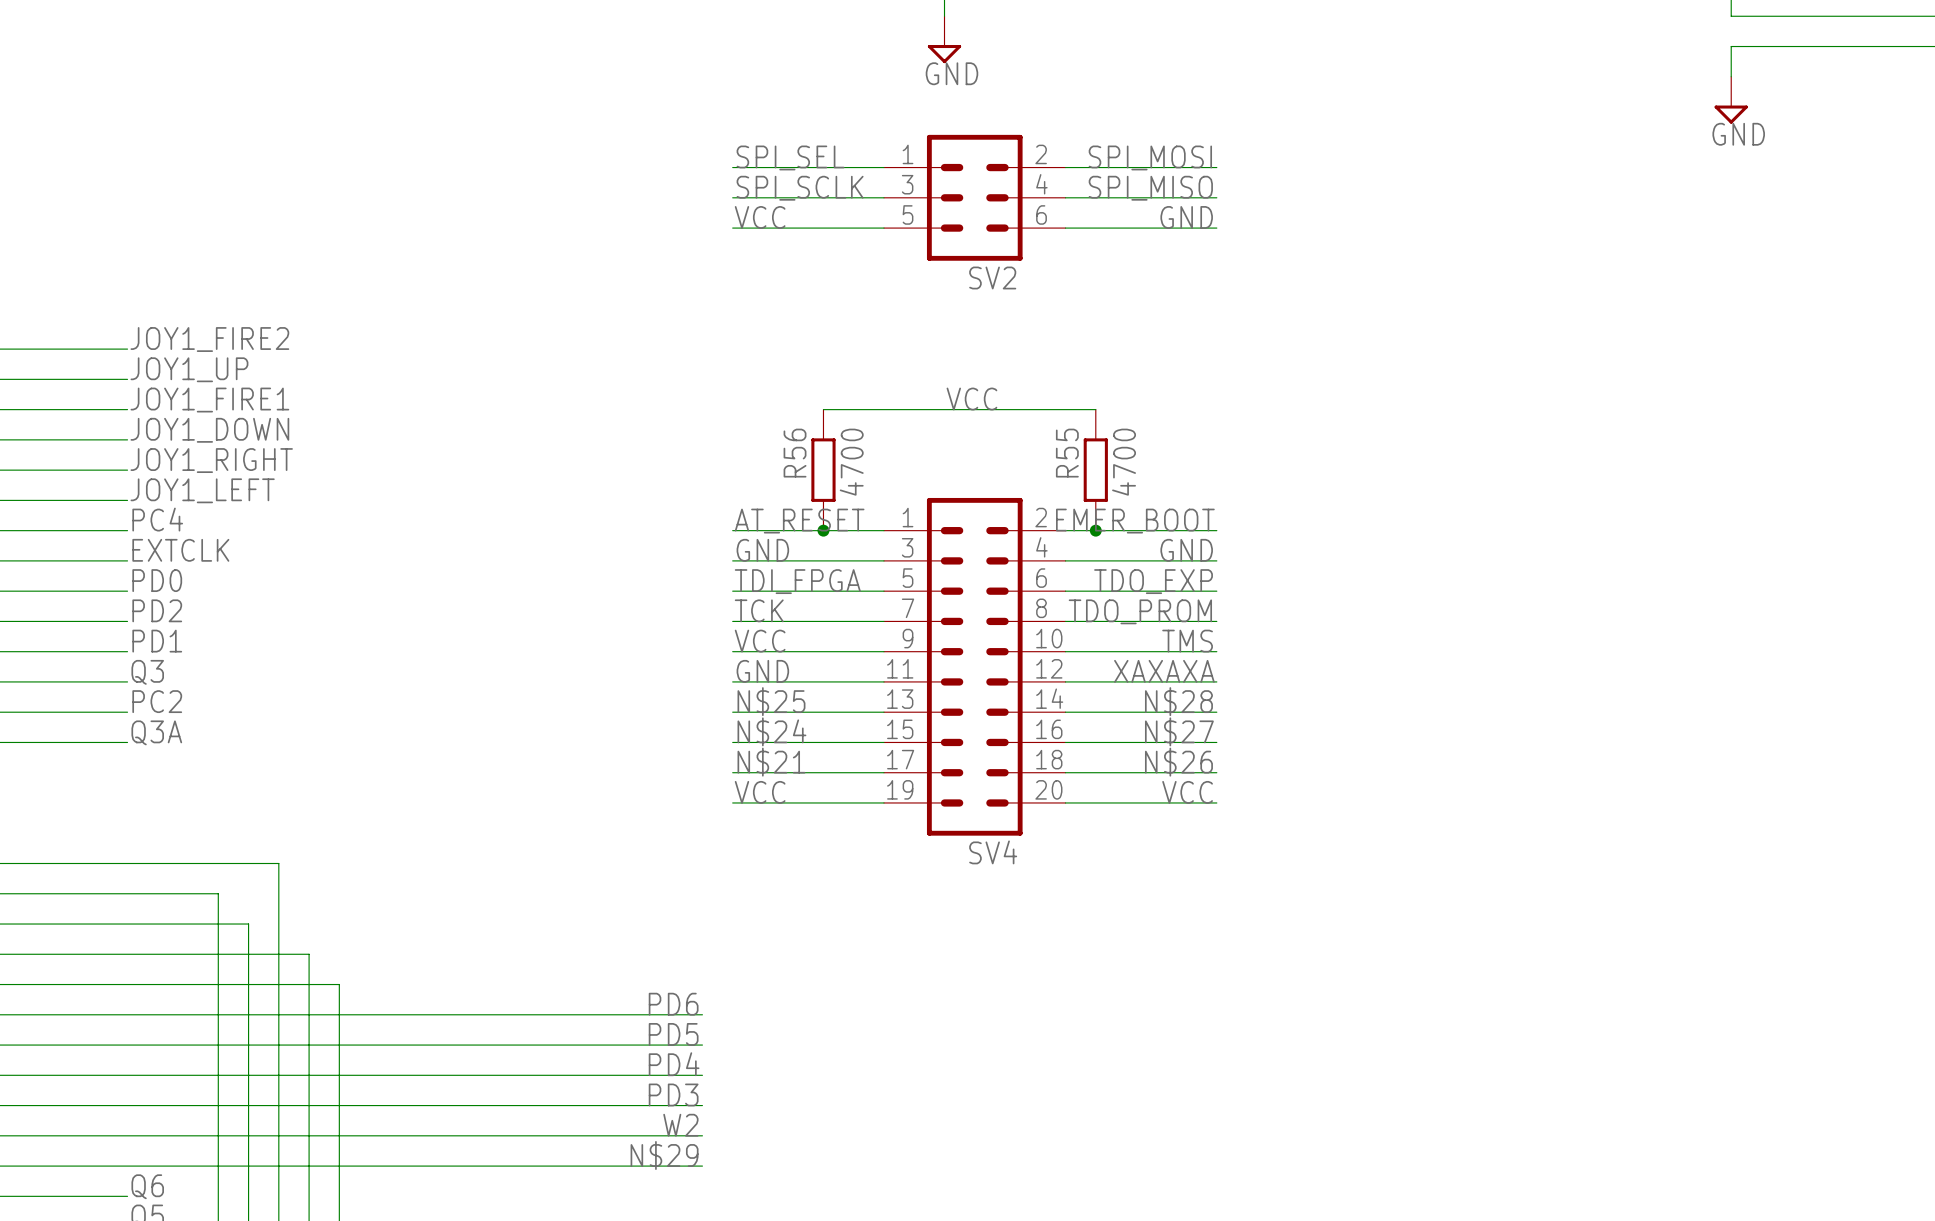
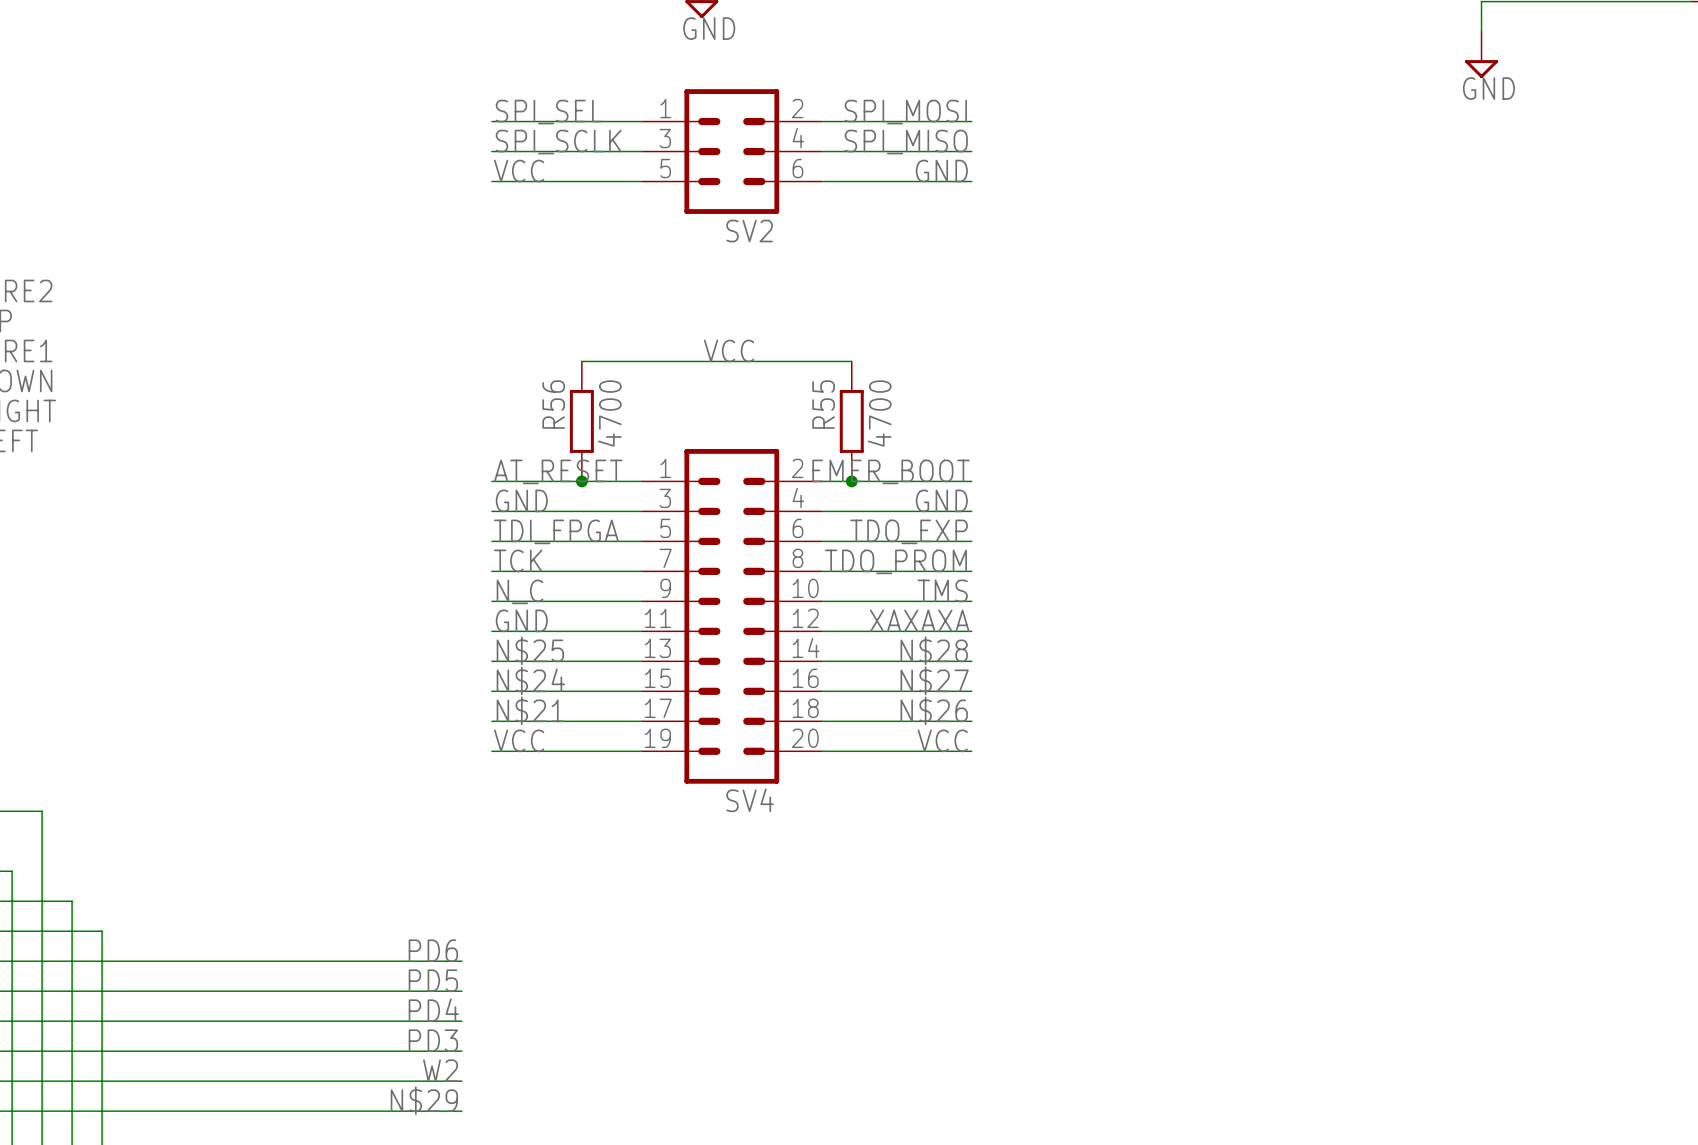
label: VCC (760, 641) -> N_C (519, 591)

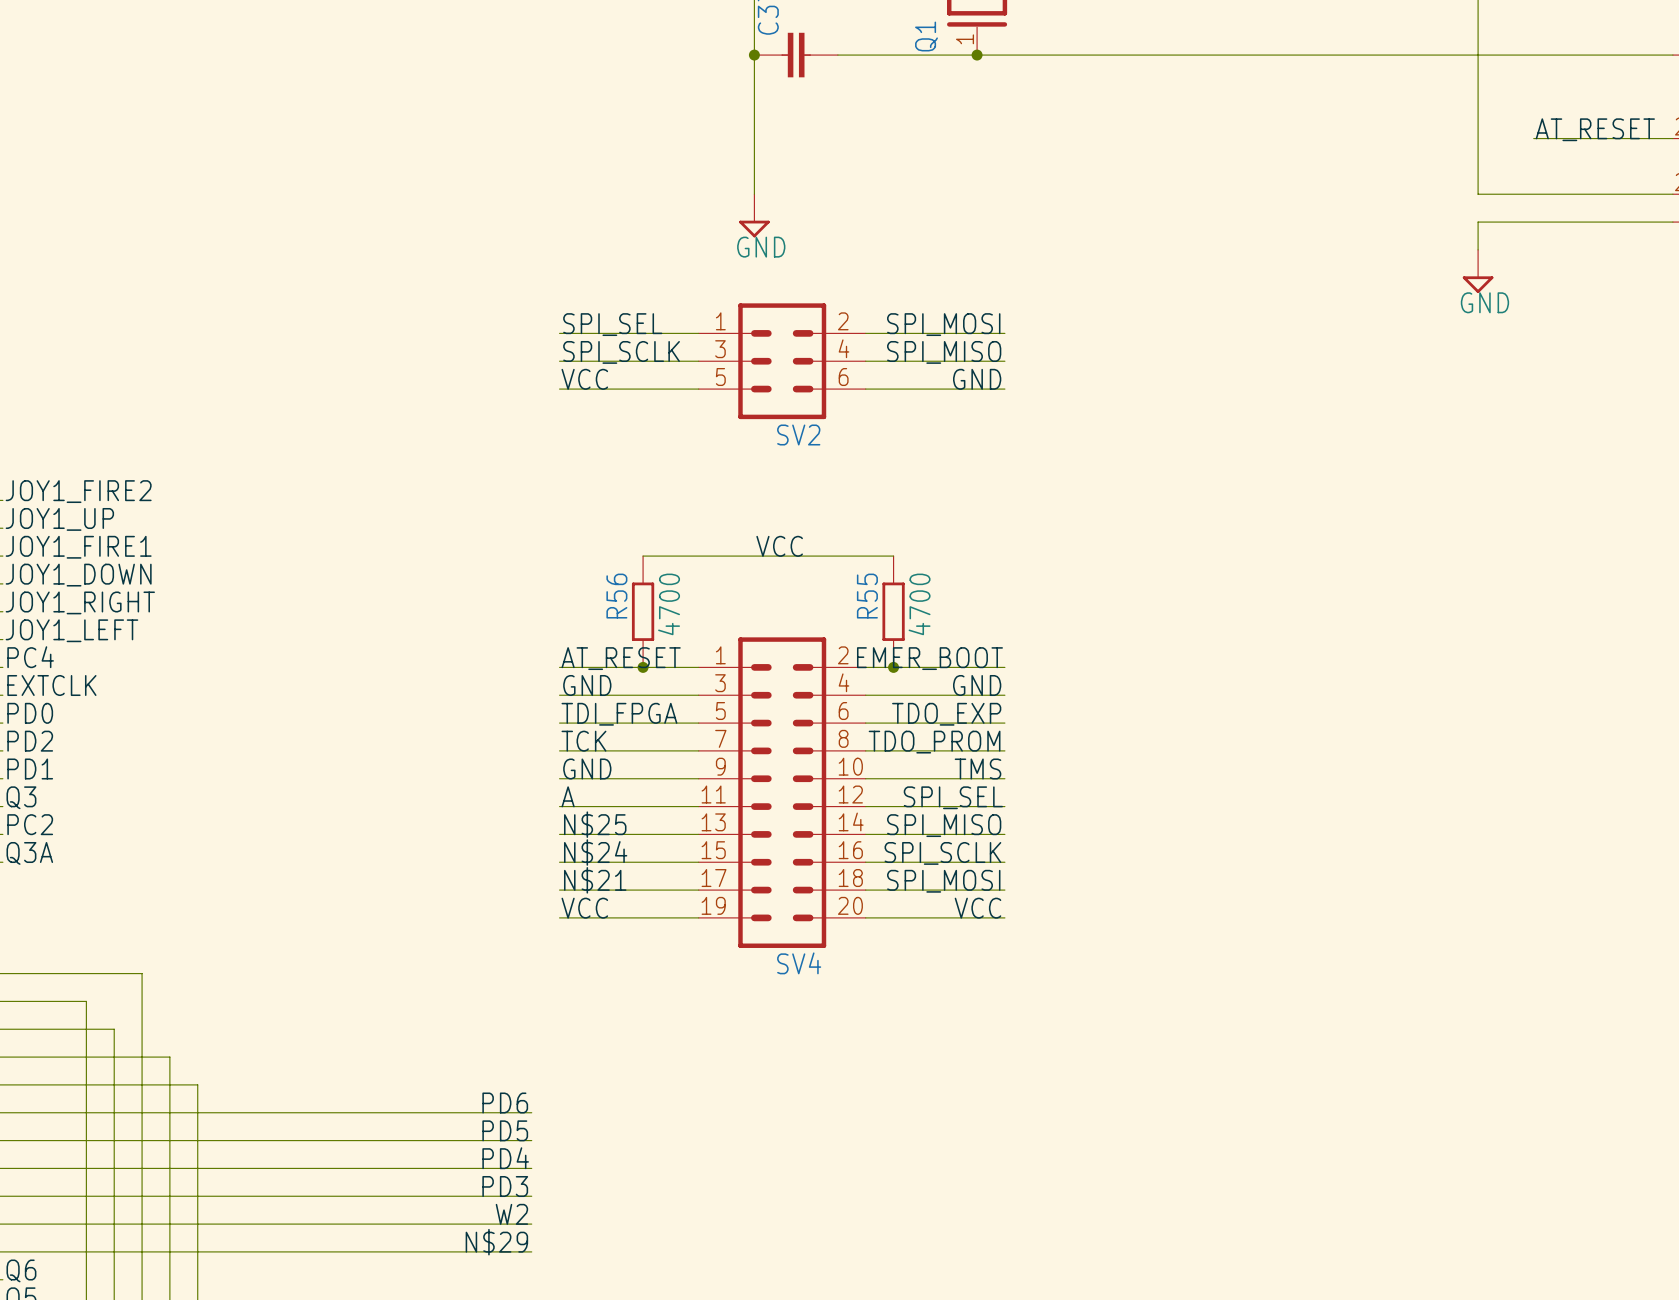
label: N_C (519, 591) -> GND (587, 769)
label: GND (521, 620) -> A (568, 796)
label: XAXAXA (919, 620) -> SPI_SEL (953, 797)
label: N$28 (934, 650) -> SPI_MISO (944, 825)
label: N$27 (934, 680) -> SPI_SCLK (942, 853)
label: N$26 (934, 710) -> SPI_MOSI (943, 881)

